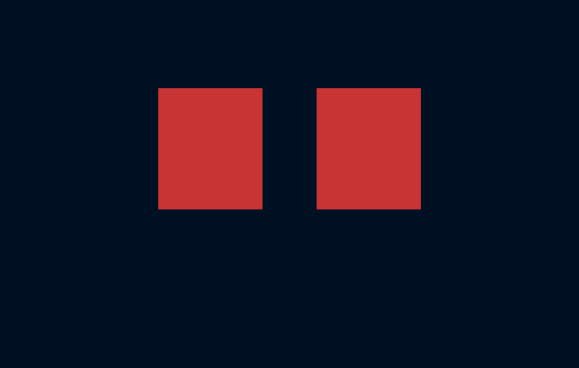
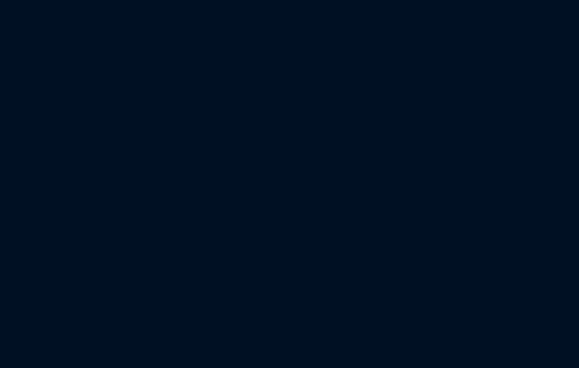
part: (289, 148) -> none

